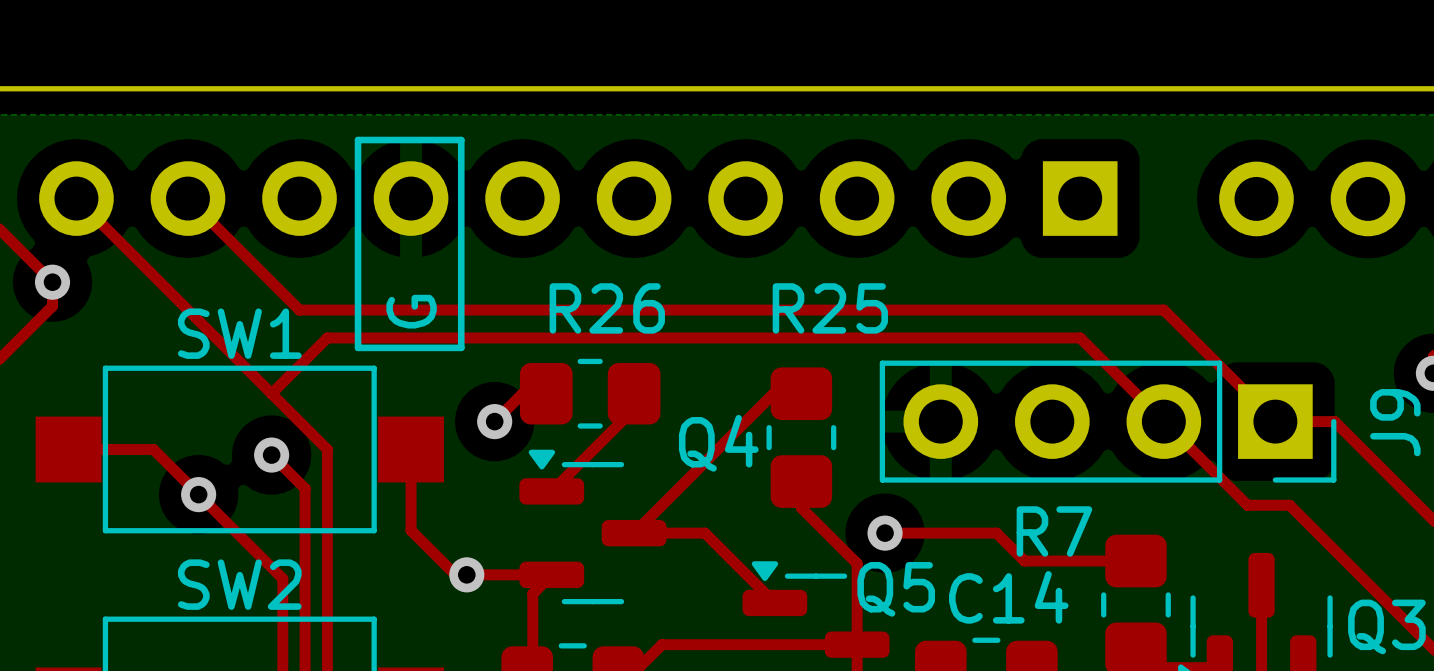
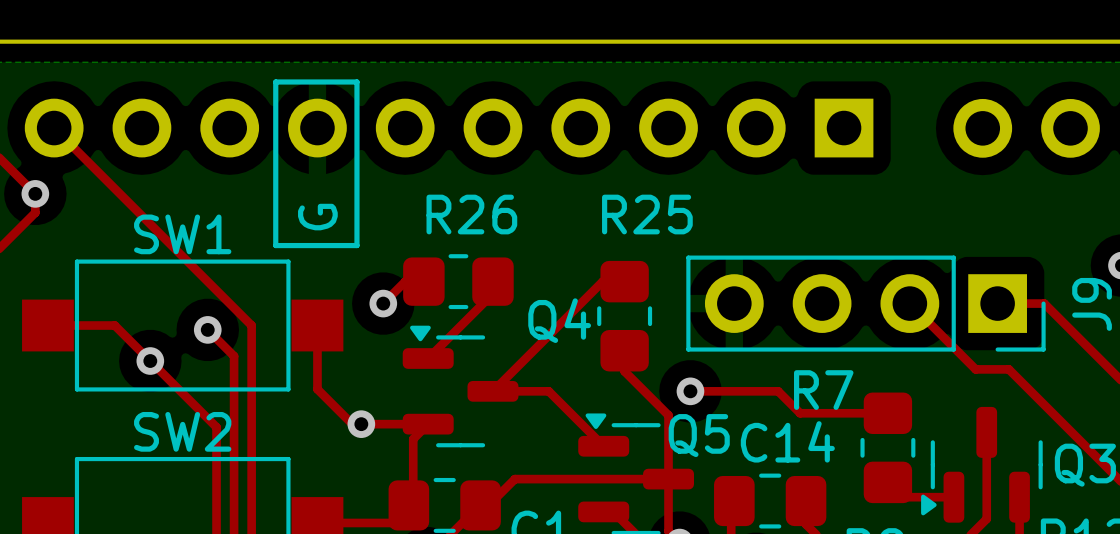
top track: (187, 198) (299, 310) (1163, 310) (1275, 421) -> none
top track: (271, 393) (327, 337) (1080, 337) (1163, 421) -> none

